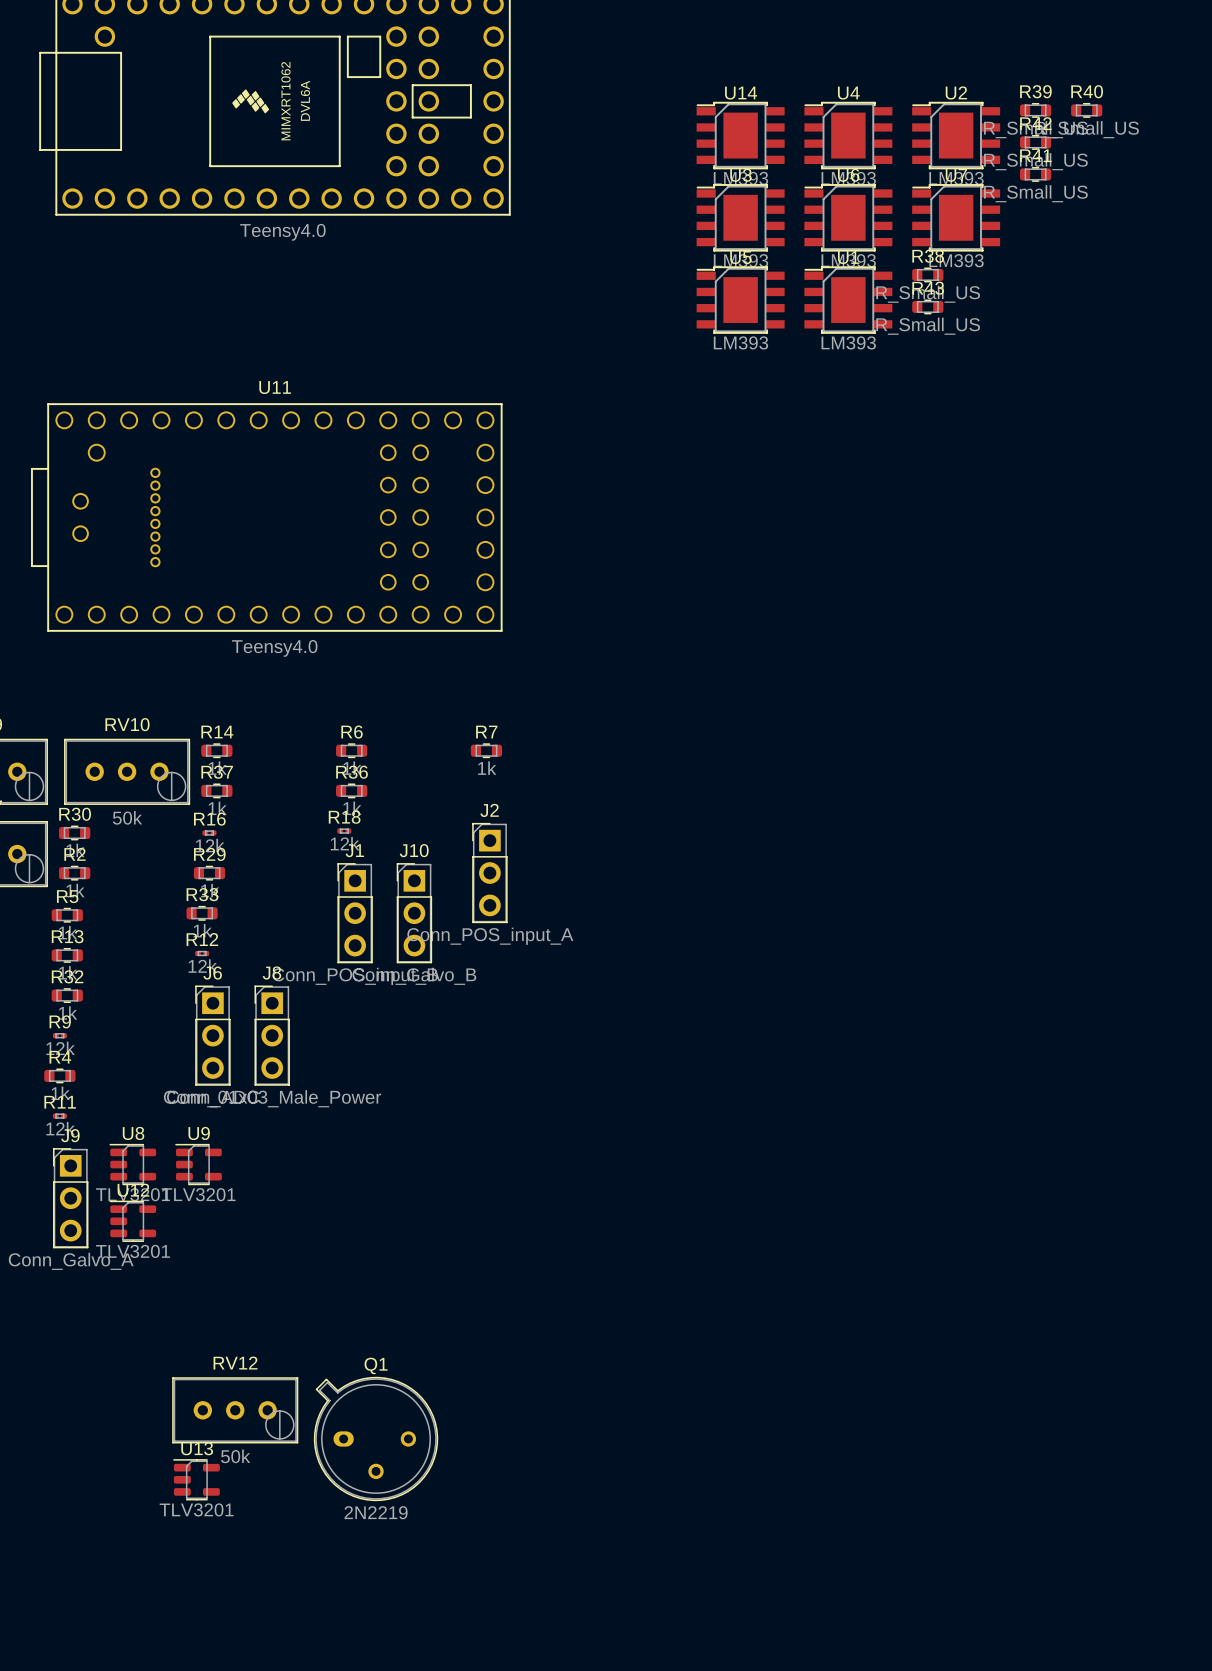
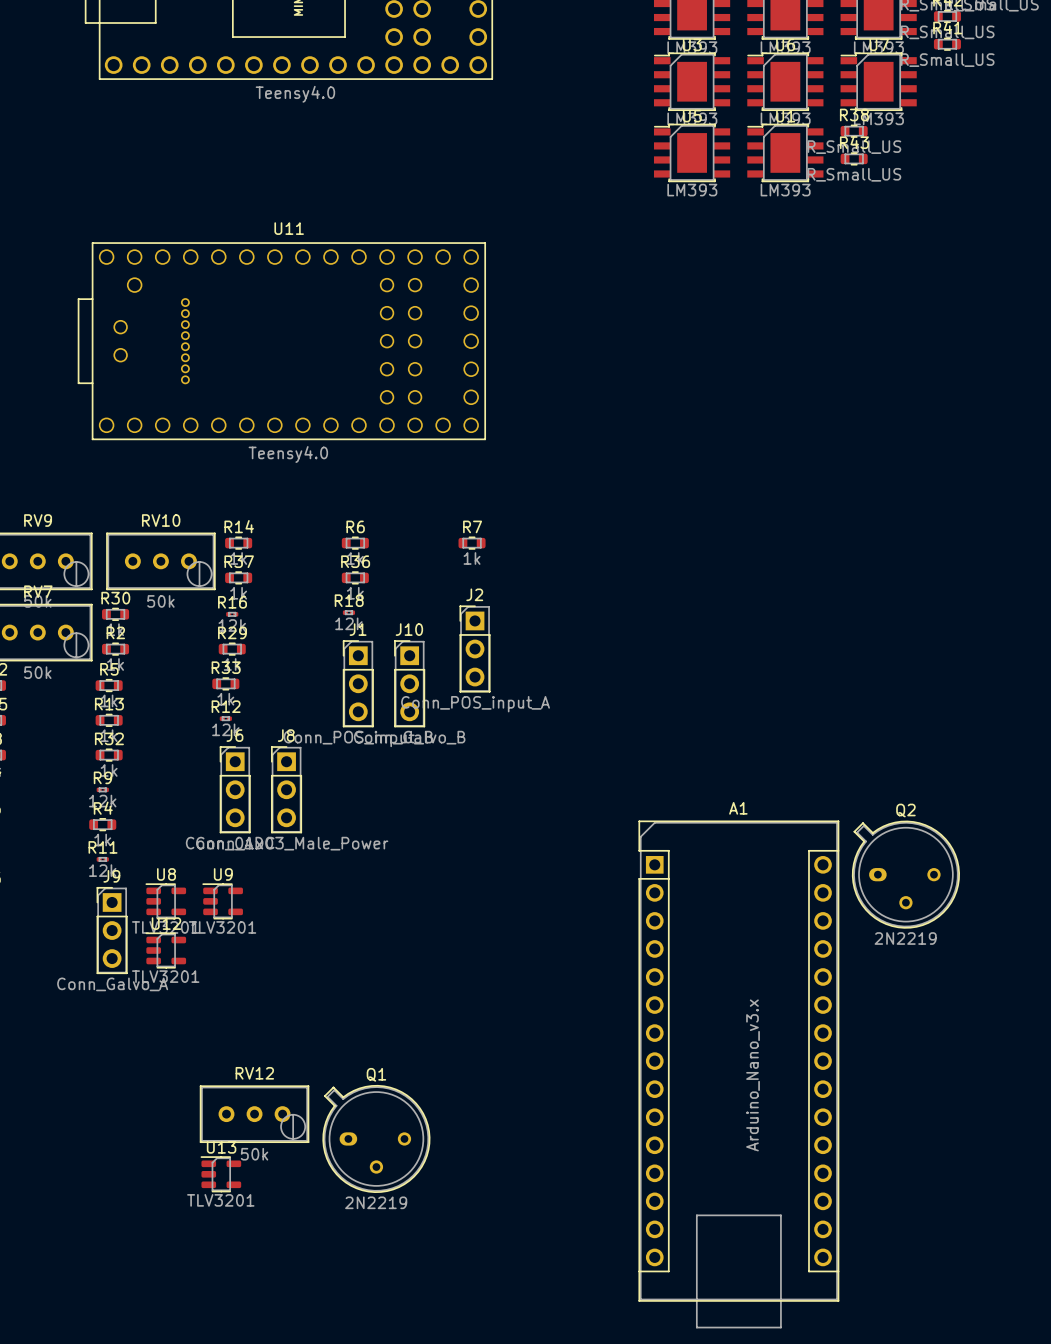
Q2: none -> 2N2219 (905, 874)
A1: none -> Arduino_Nano_v3.x (738, 1074)

